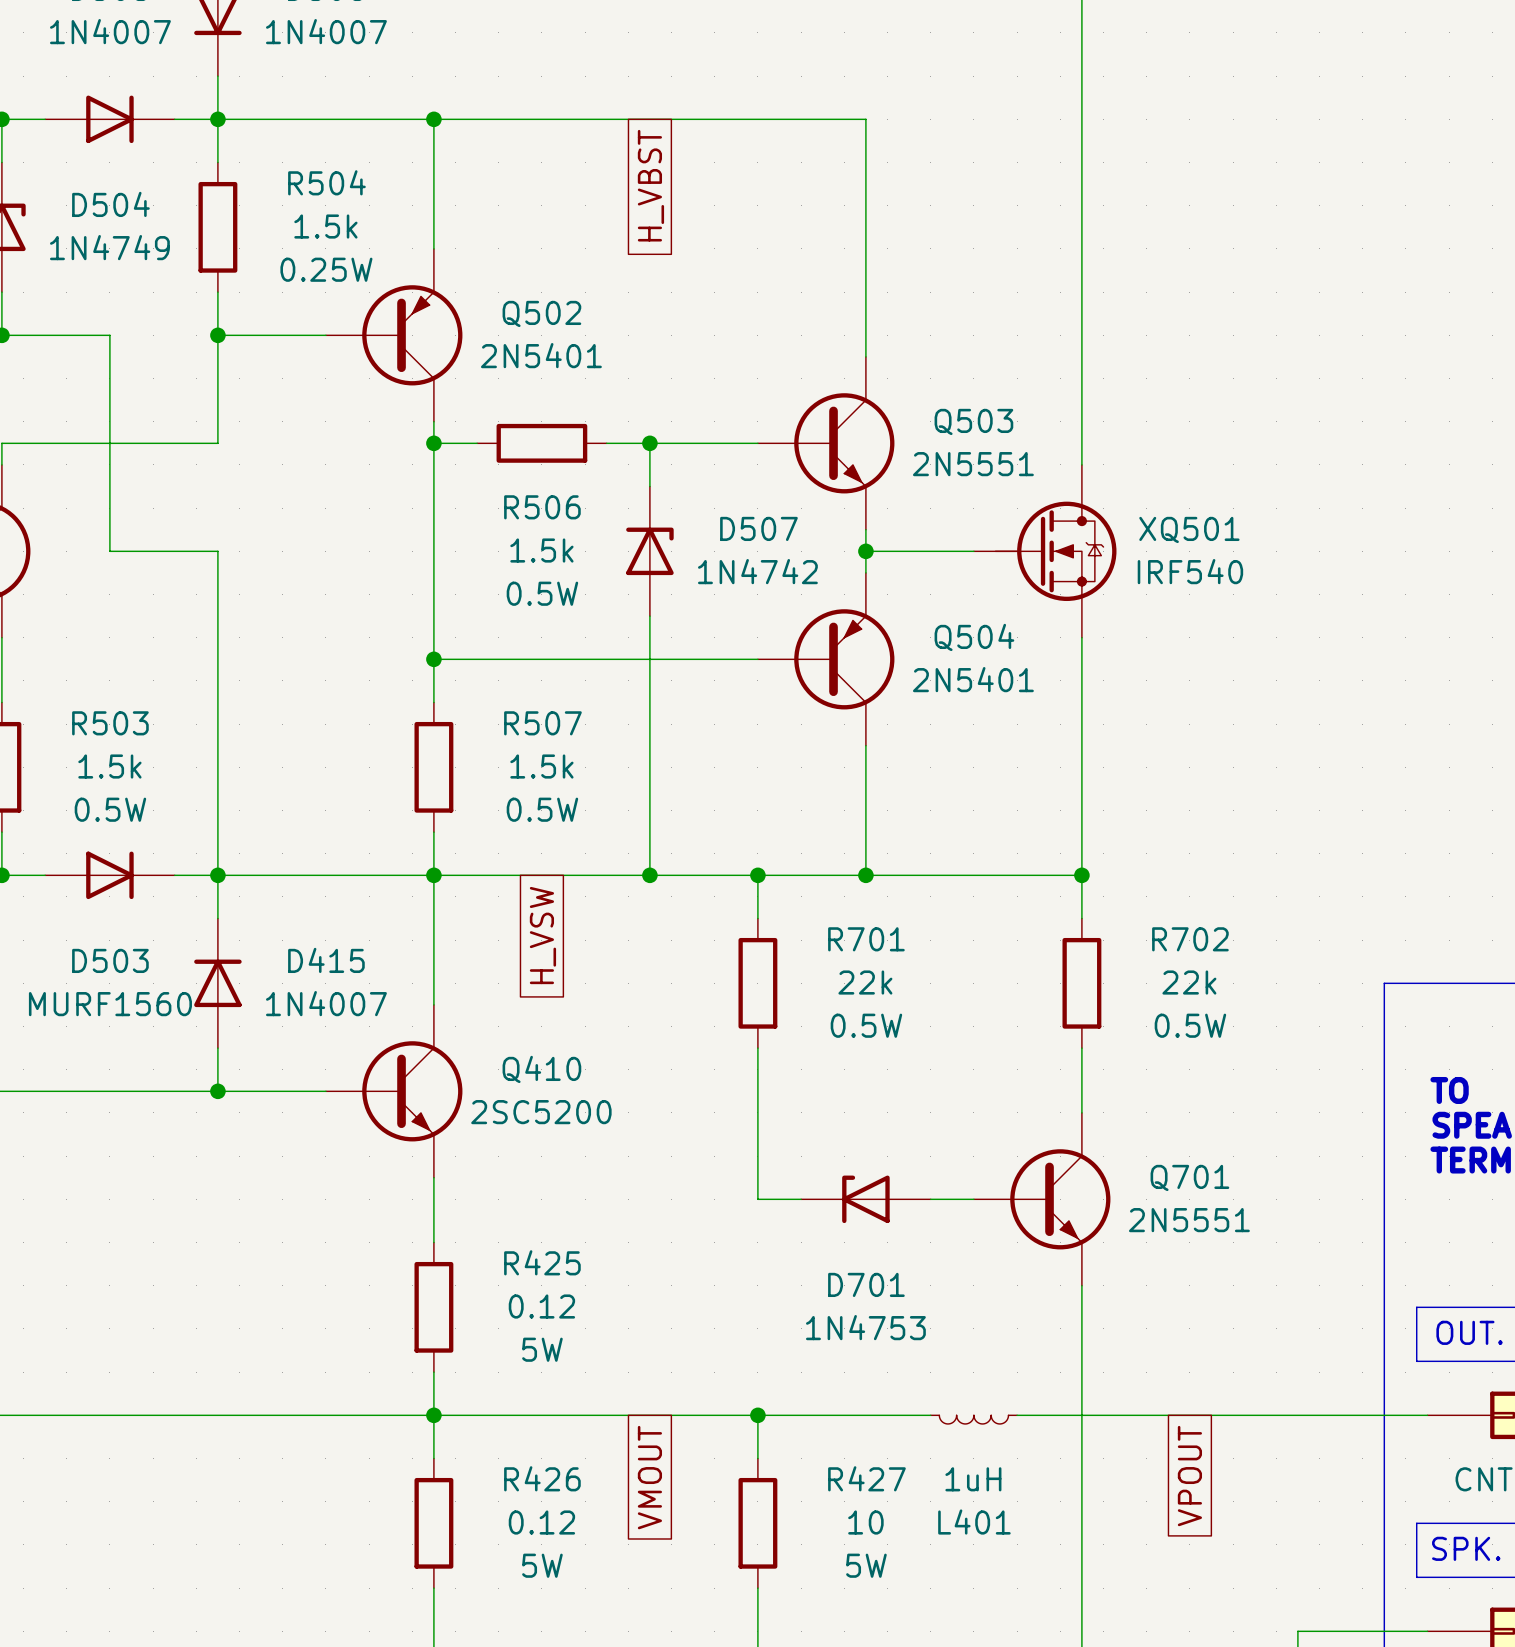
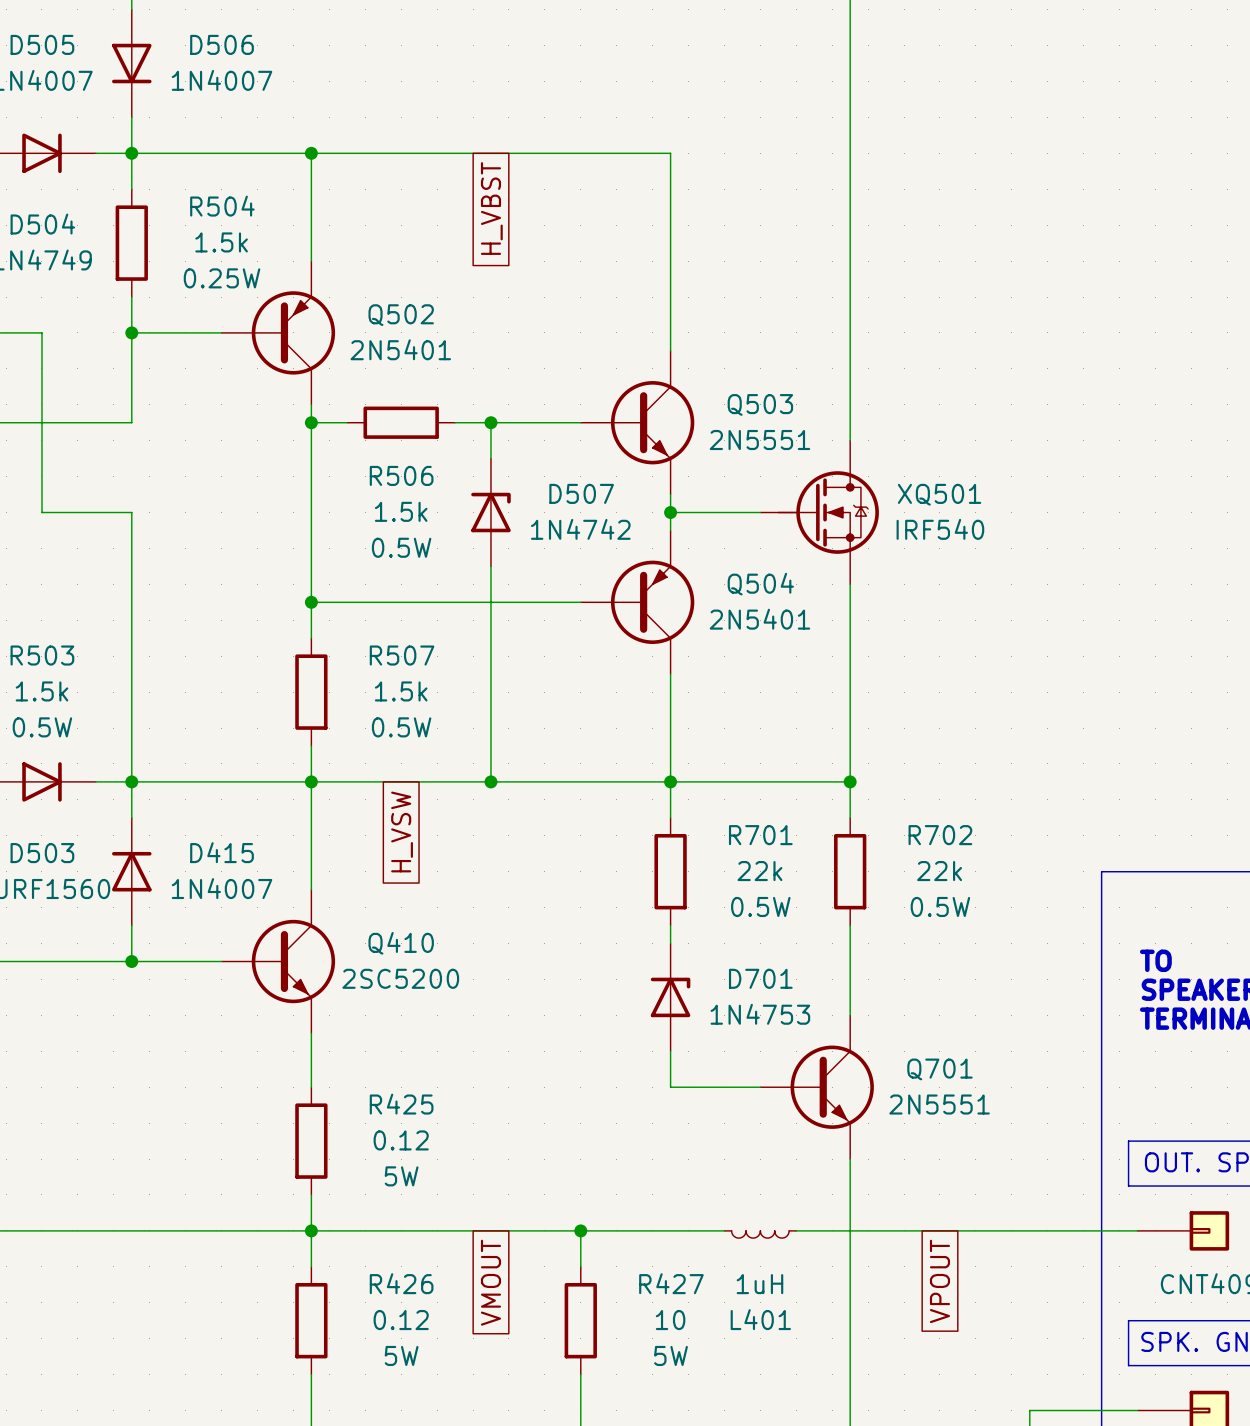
wire: (757, 875) (757, 918) -> (670, 781) (670, 817)
junction: (757, 875) -> none
R701 position: (757, 983) -> (670, 871)
wire: (757, 1048) (757, 1199) (801, 1199) -> none
wire: none -> (670, 925) (670, 943)
wire: none -> (670, 1051) (670, 1087) (760, 1087)
D701 rotation: 0° (865, 1199) -> 90° clockwise (670, 997)
wire: (930, 1199) (973, 1199) -> none
Q701 position: (1042, 1199) -> (817, 1087)
D701 name position: D701 (866, 1284) -> D701 (760, 978)
D701 value position: 1N4753 (865, 1327) -> 1N4753 (760, 1014)

